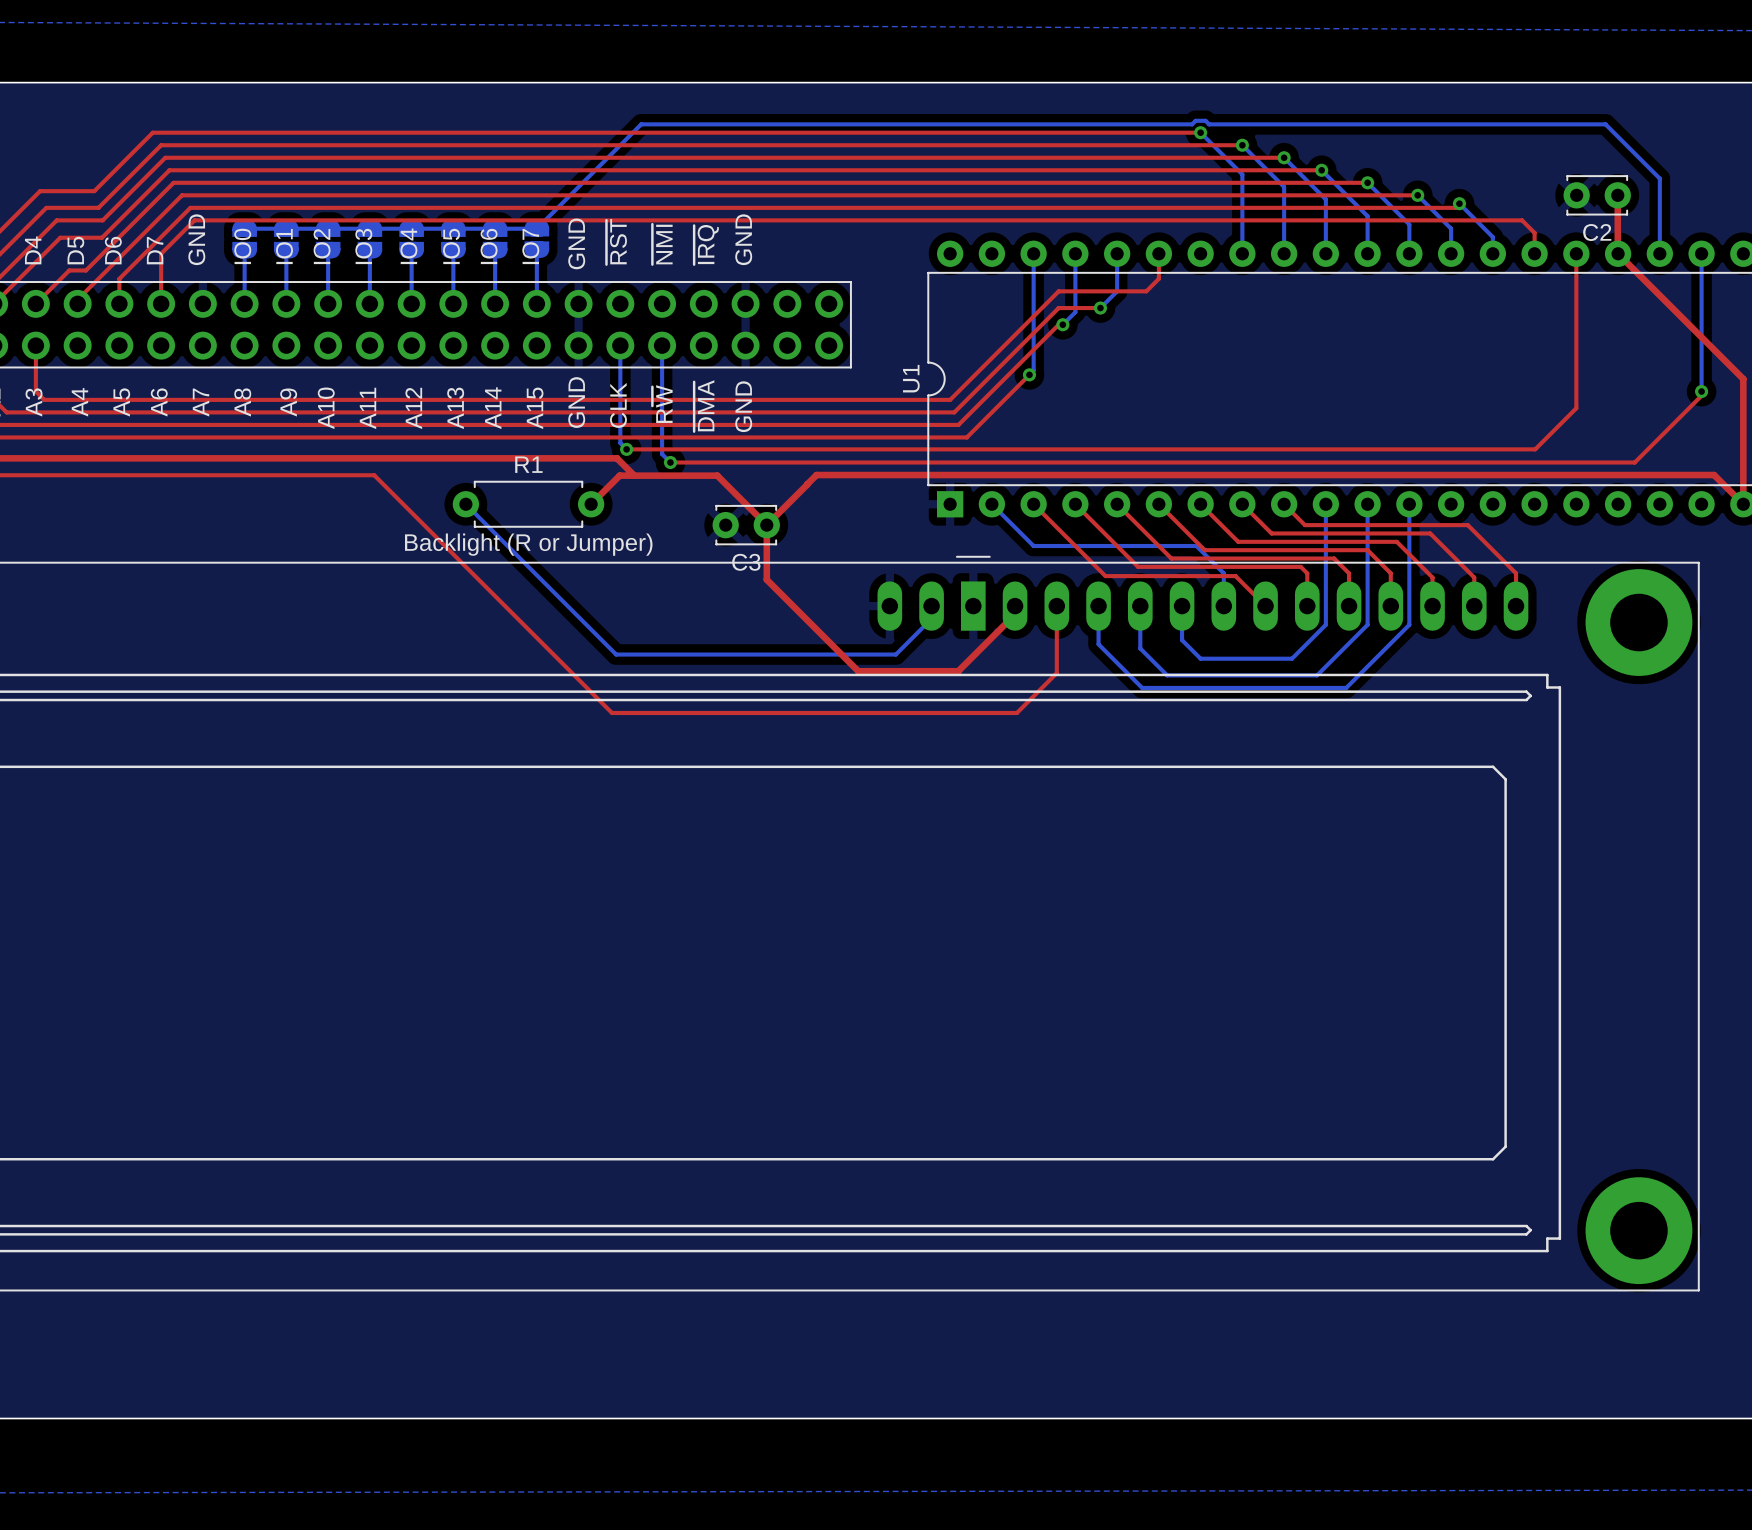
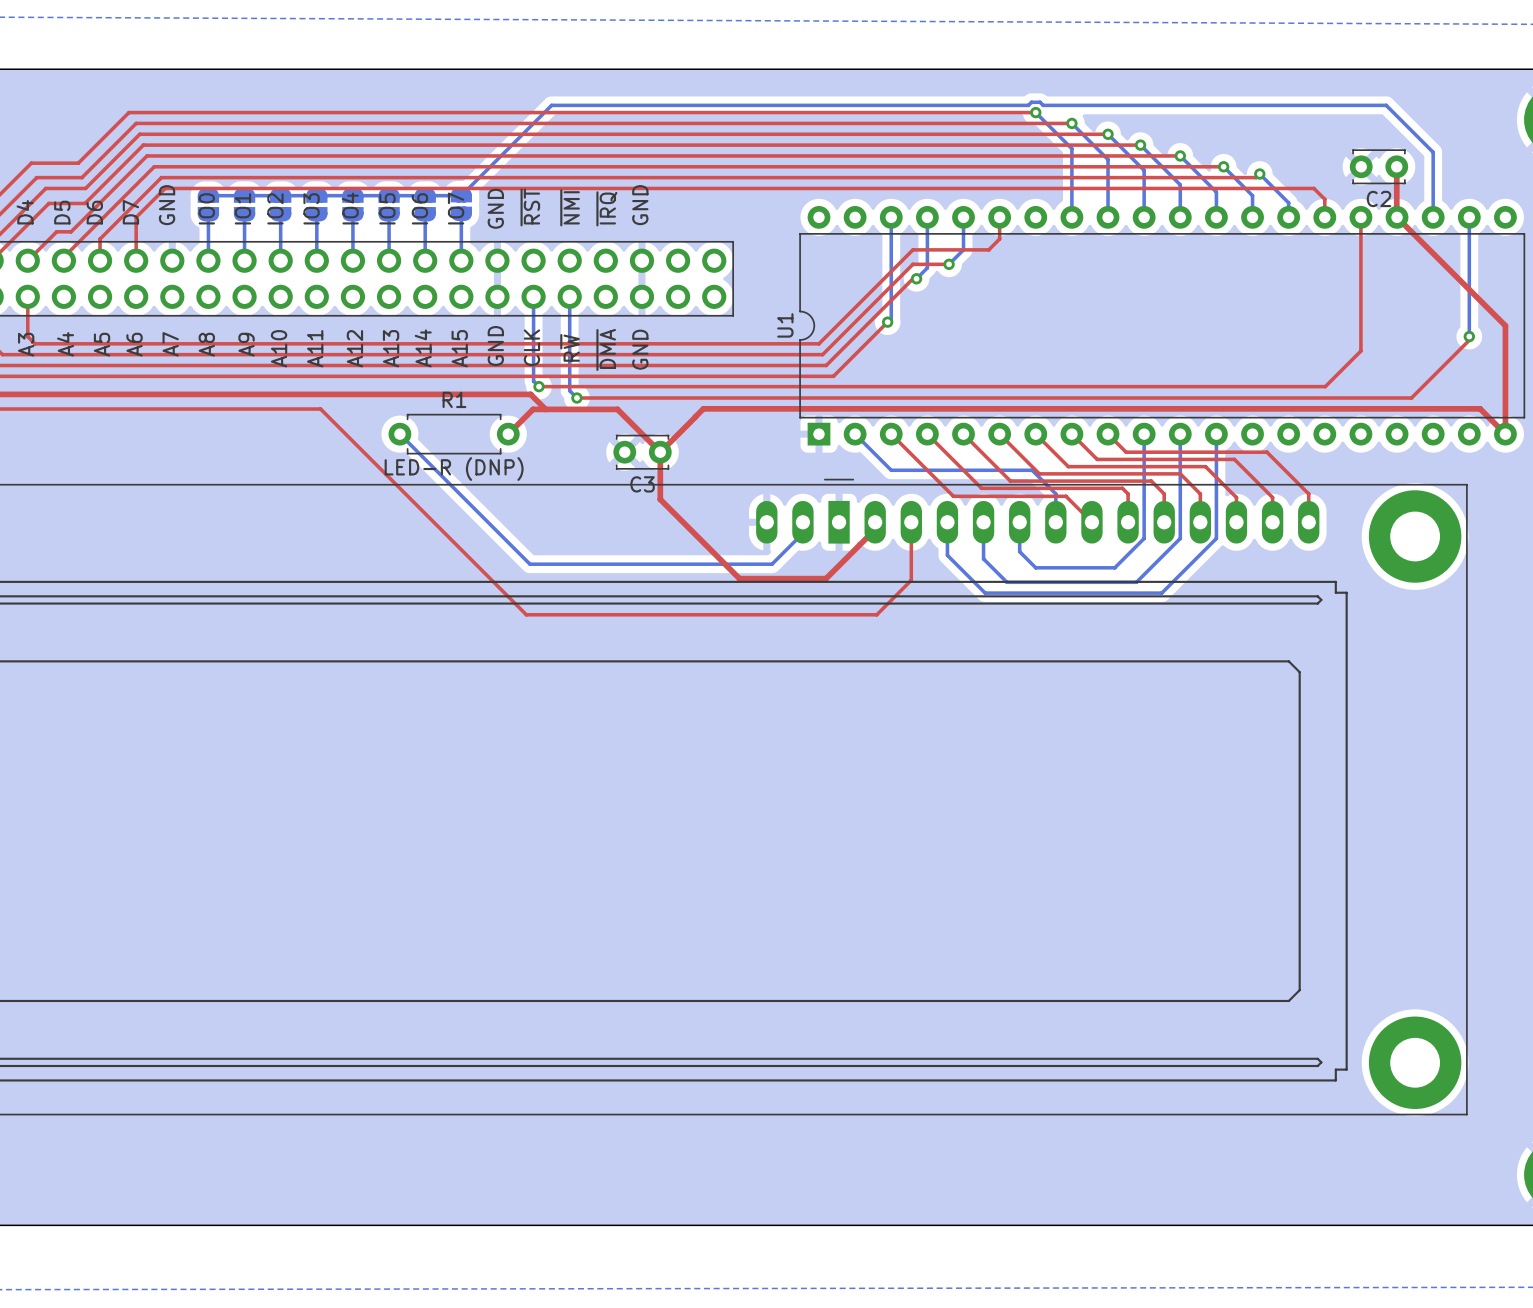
R1 value: Backlight (R or Jumper) (528, 544) -> LED-R (DNP) (454, 469)

